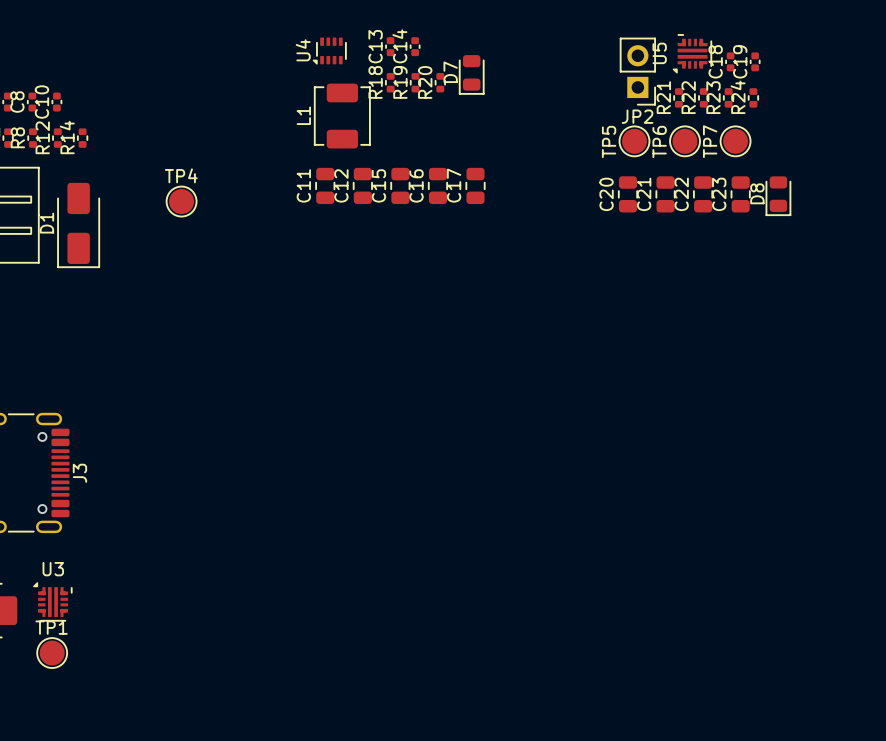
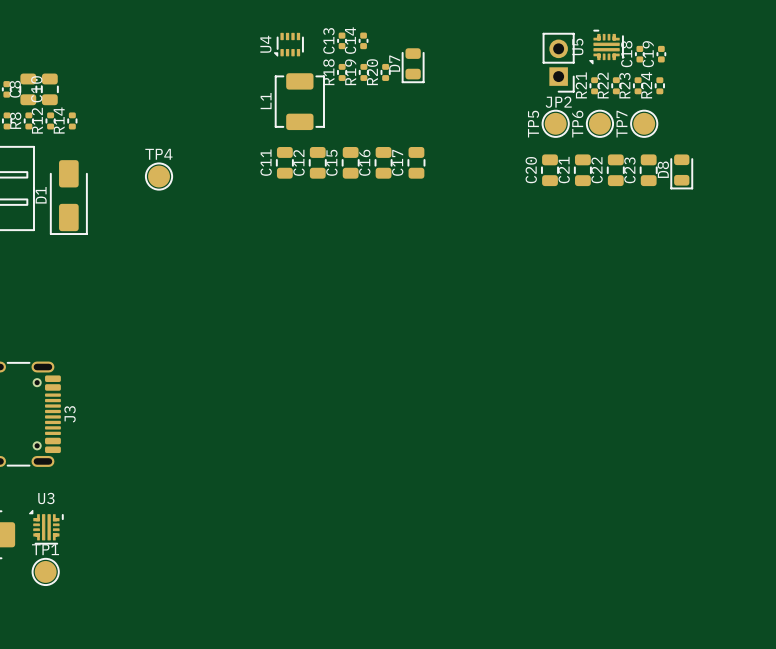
C8 footprint: [27, 92, 38, 112] -> [19, 73, 38, 106]
C10 footprint: [51, 92, 63, 112] -> [41, 73, 59, 106]

